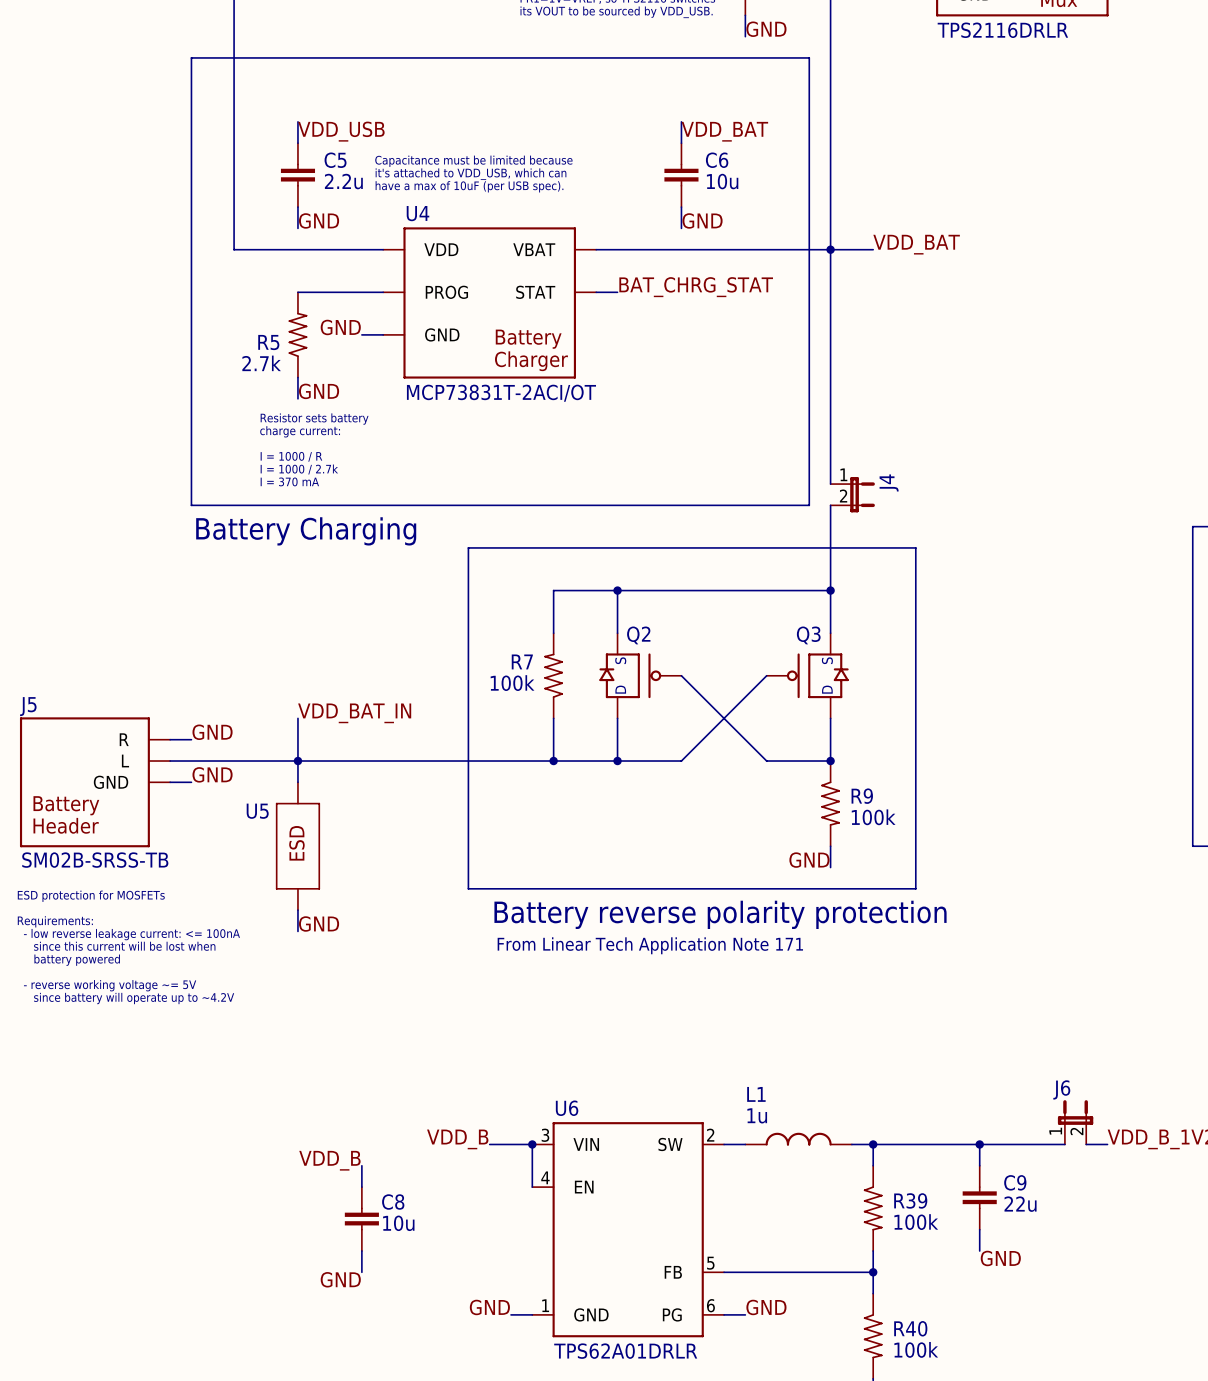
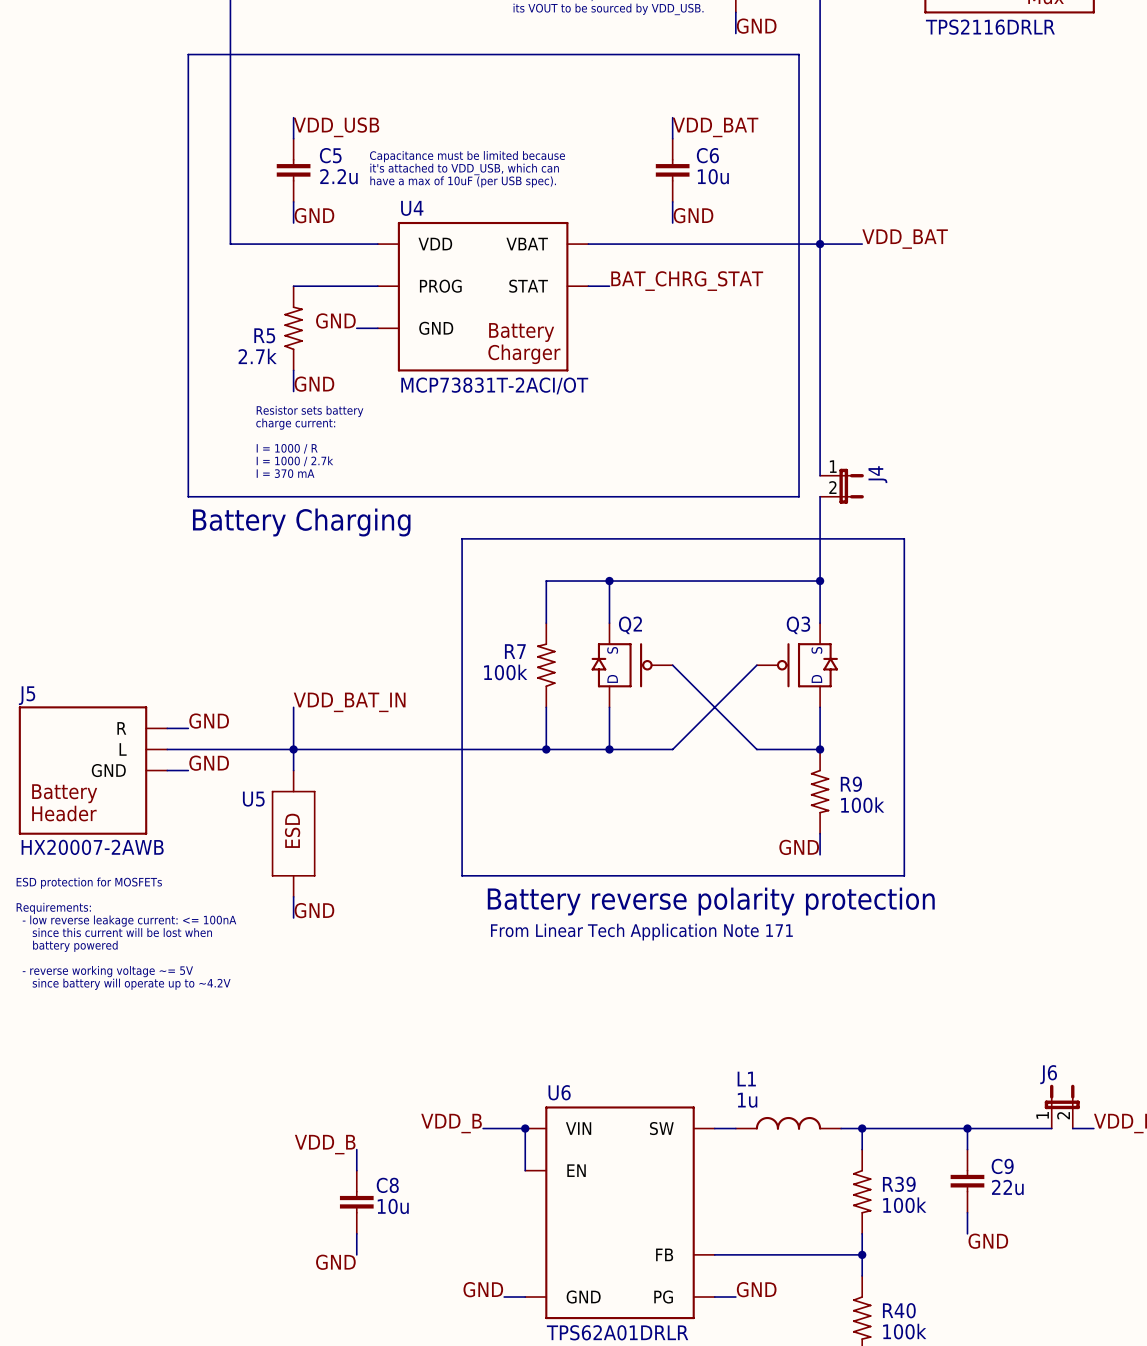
J5 text: SM02B-SRSS-TB (95, 860) -> HX20007-2AWB (92, 847)
U6 pin number: 3 (545, 1135) -> none
U6 pin number: 2 (710, 1135) -> none
U6 pin number: 4 (545, 1177) -> none
U6 pin number: 5 (710, 1263) -> none
U6 pin number: 1 (545, 1305) -> none
U6 pin number: 6 (710, 1305) -> none

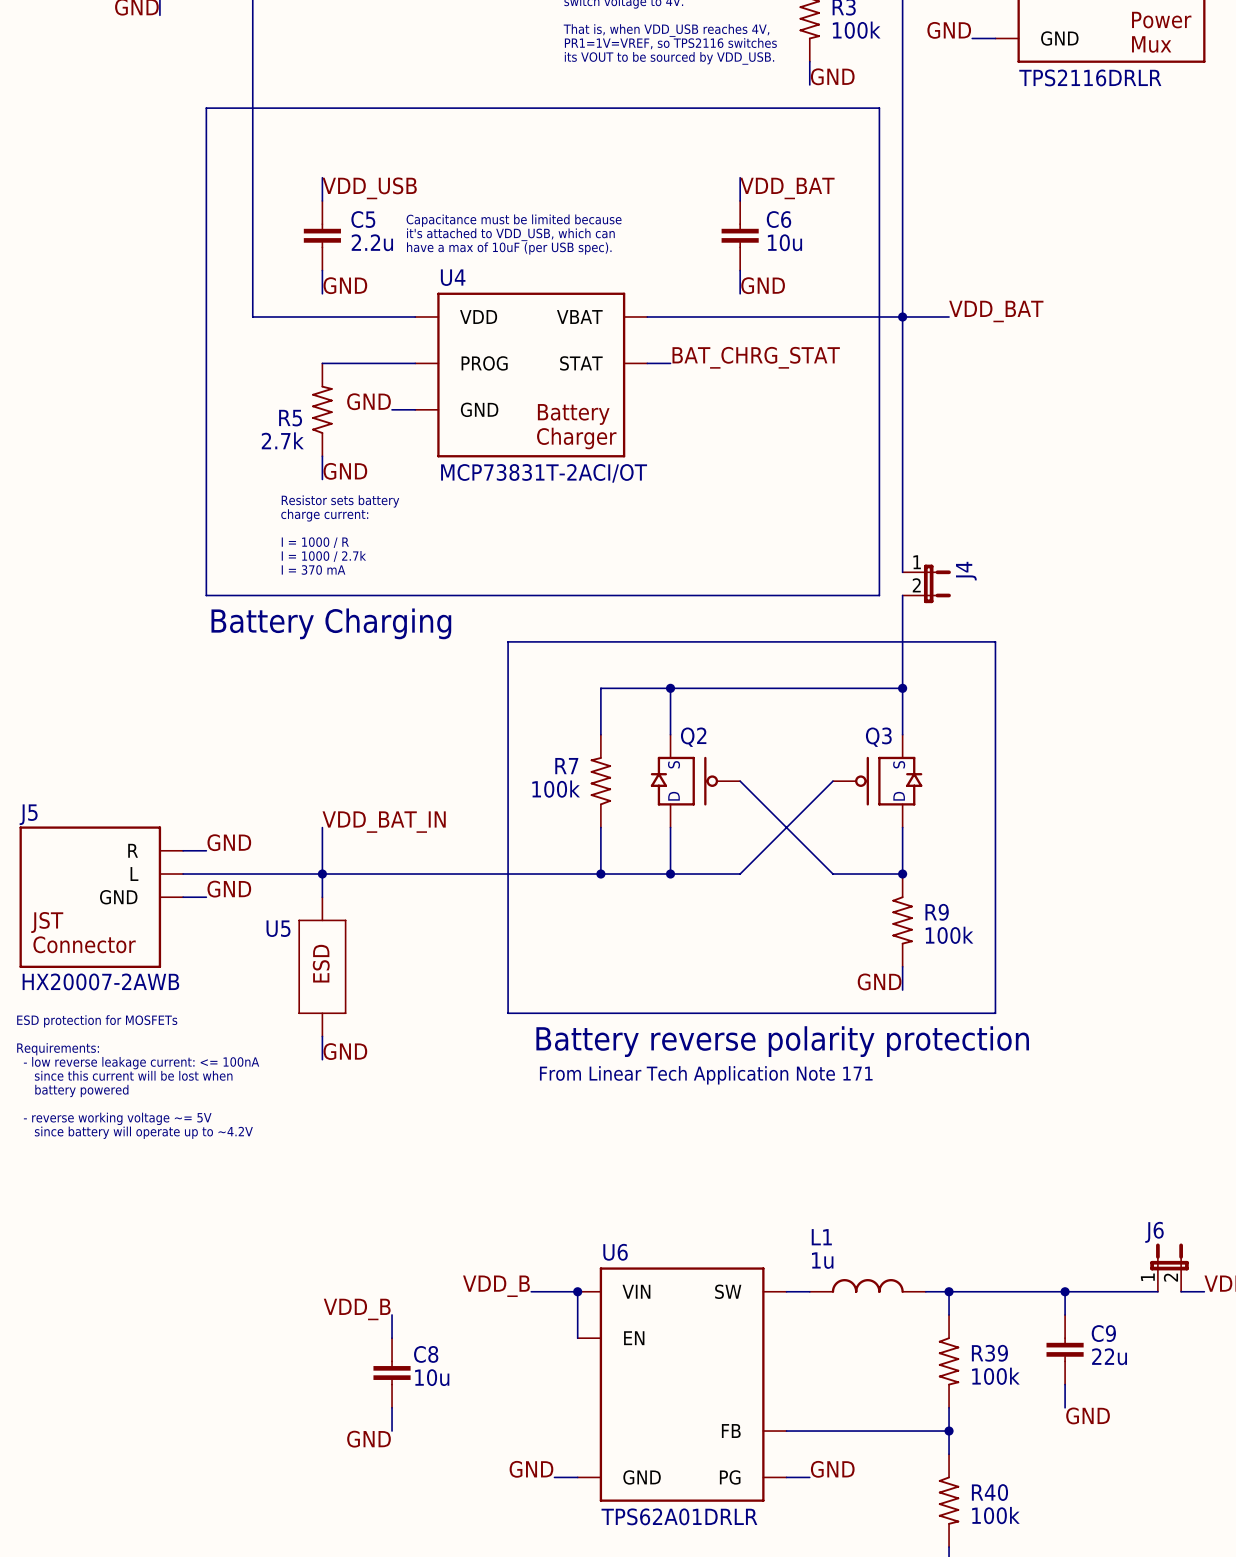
J5 text: Battery (64, 793) -> JST (47, 922)
J5 text: Header (64, 813) -> Connector (84, 944)

